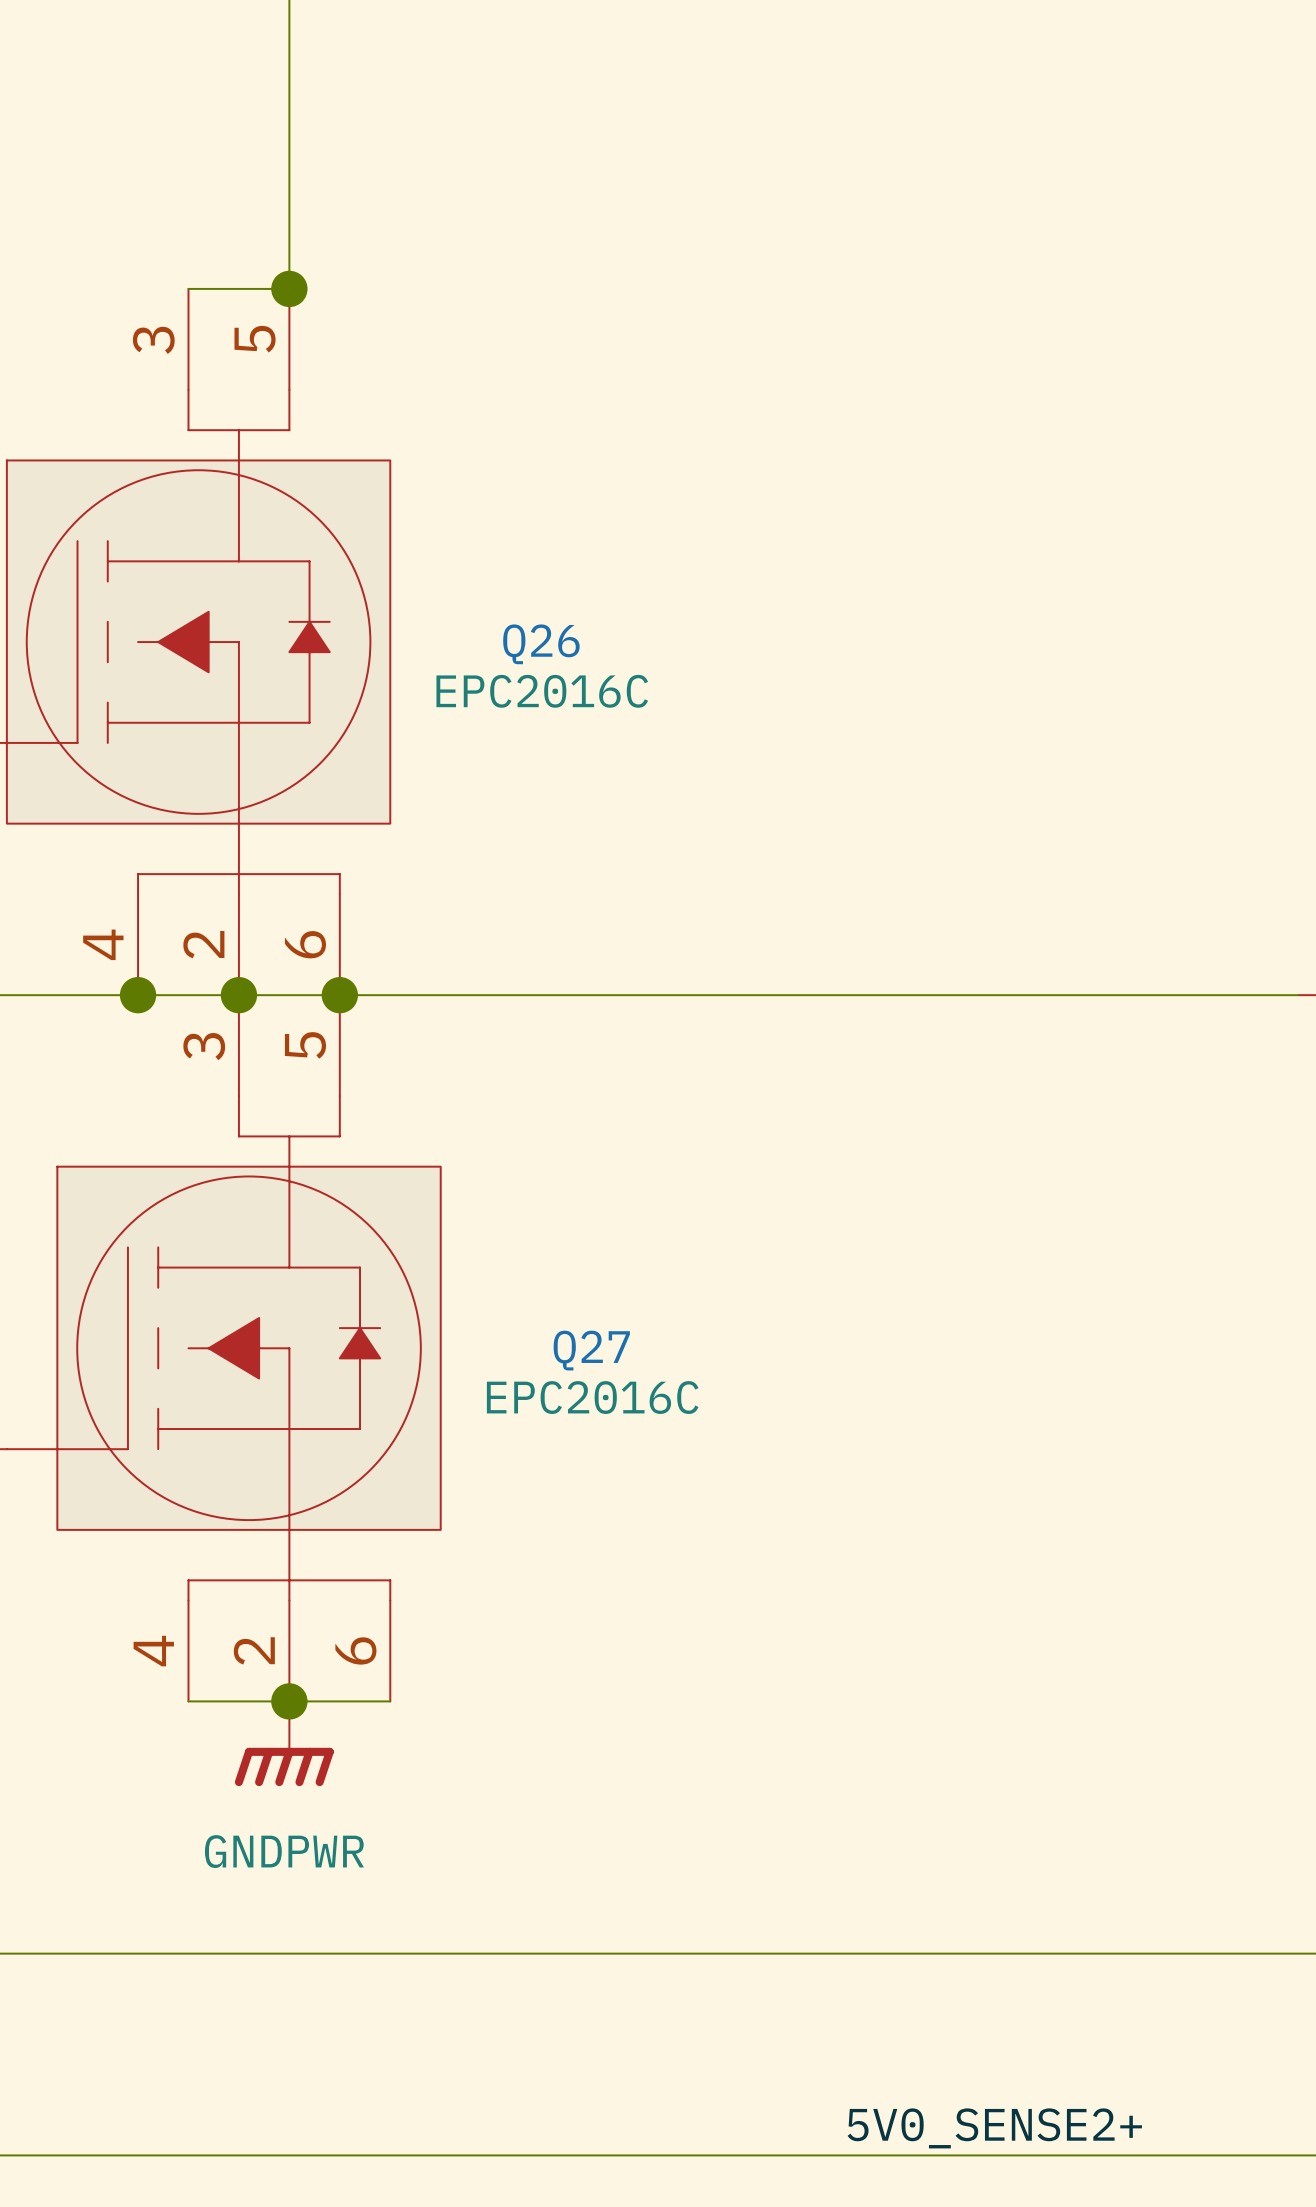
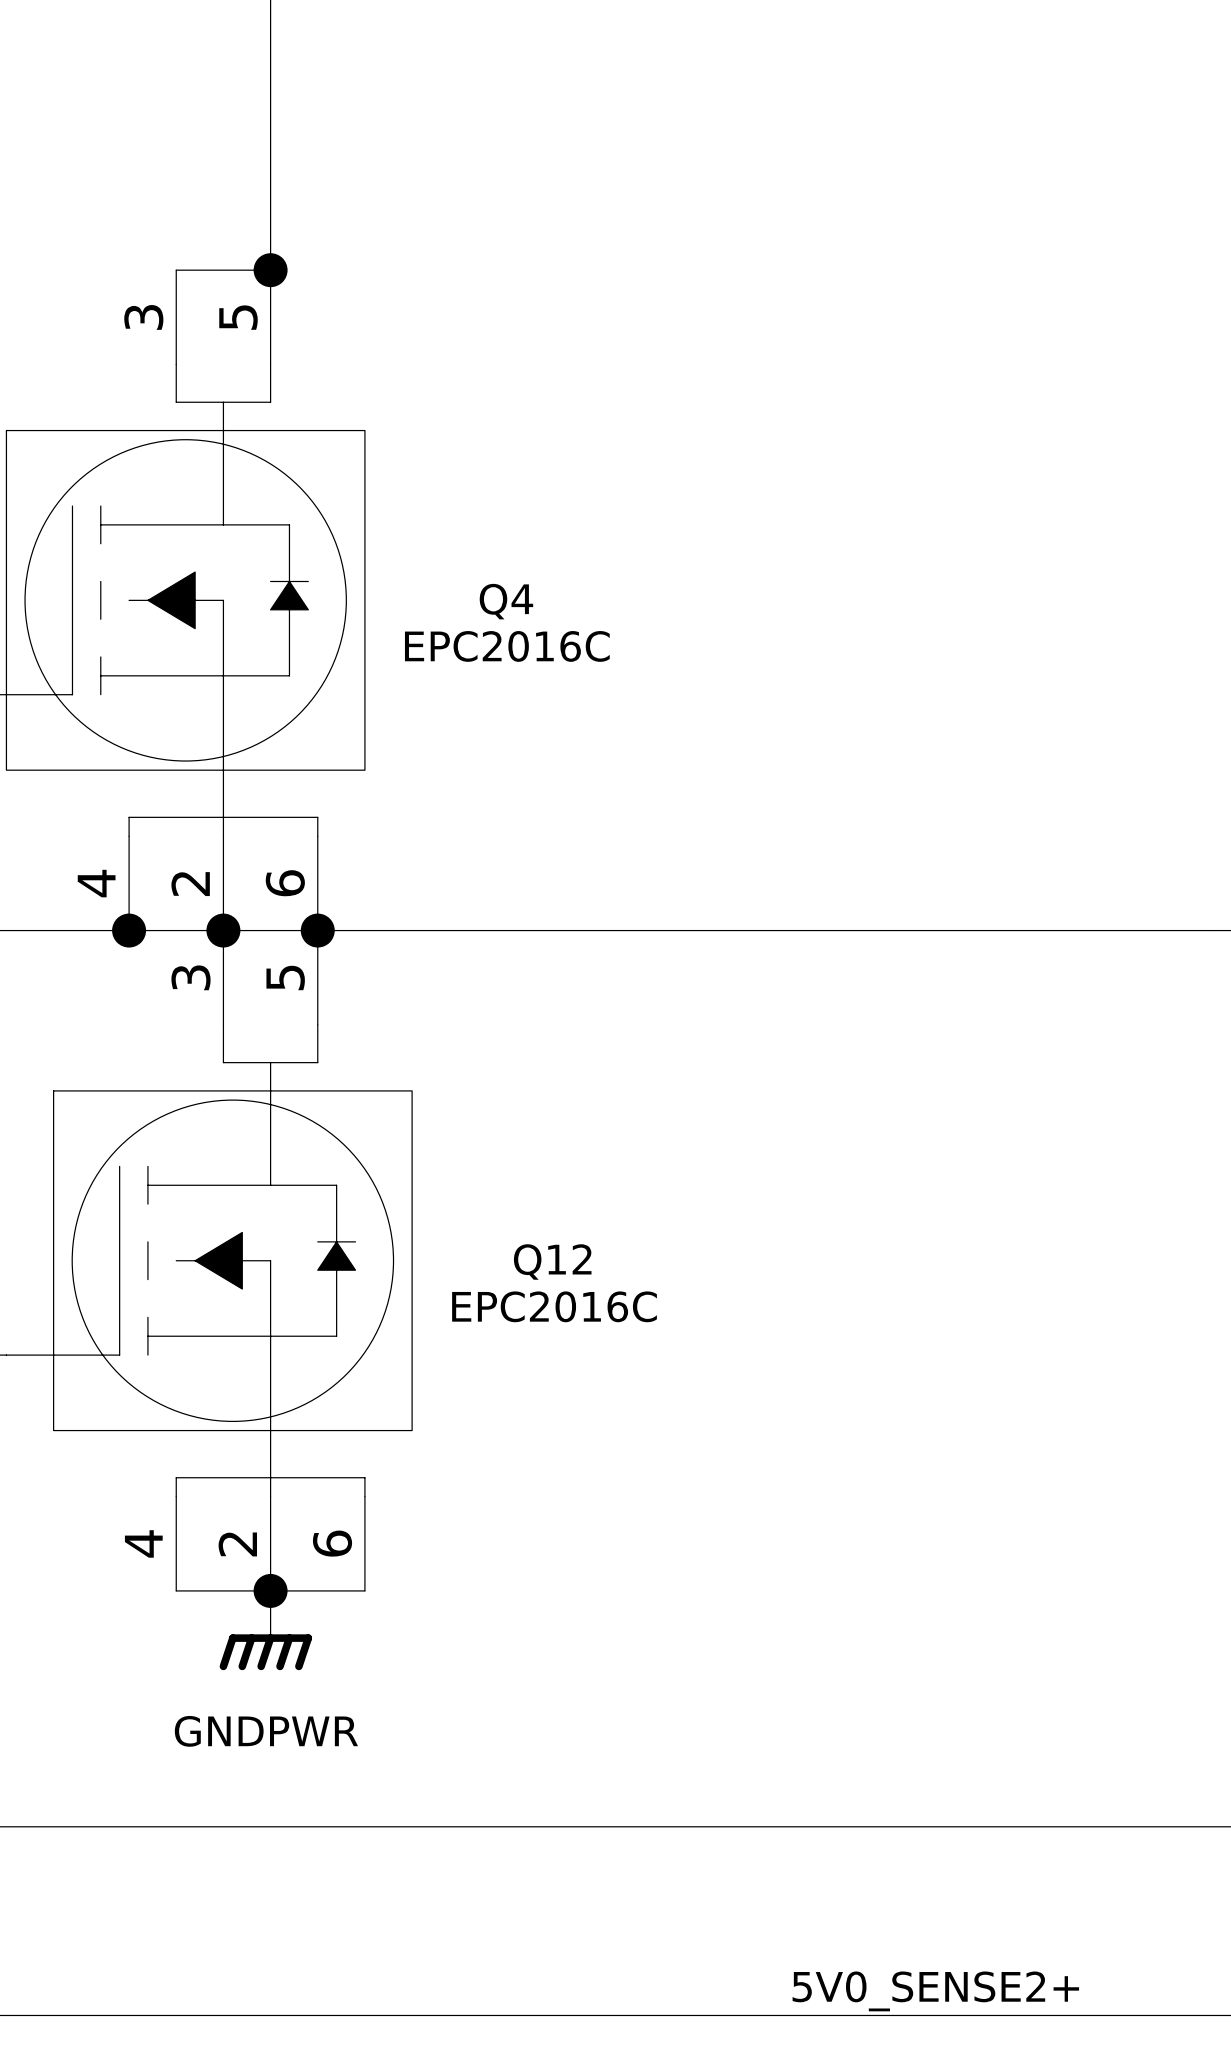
Q26 name: Q26 (541, 644) -> Q4 (506, 601)
Q27 name: Q27 (591, 1350) -> Q12 (552, 1262)

